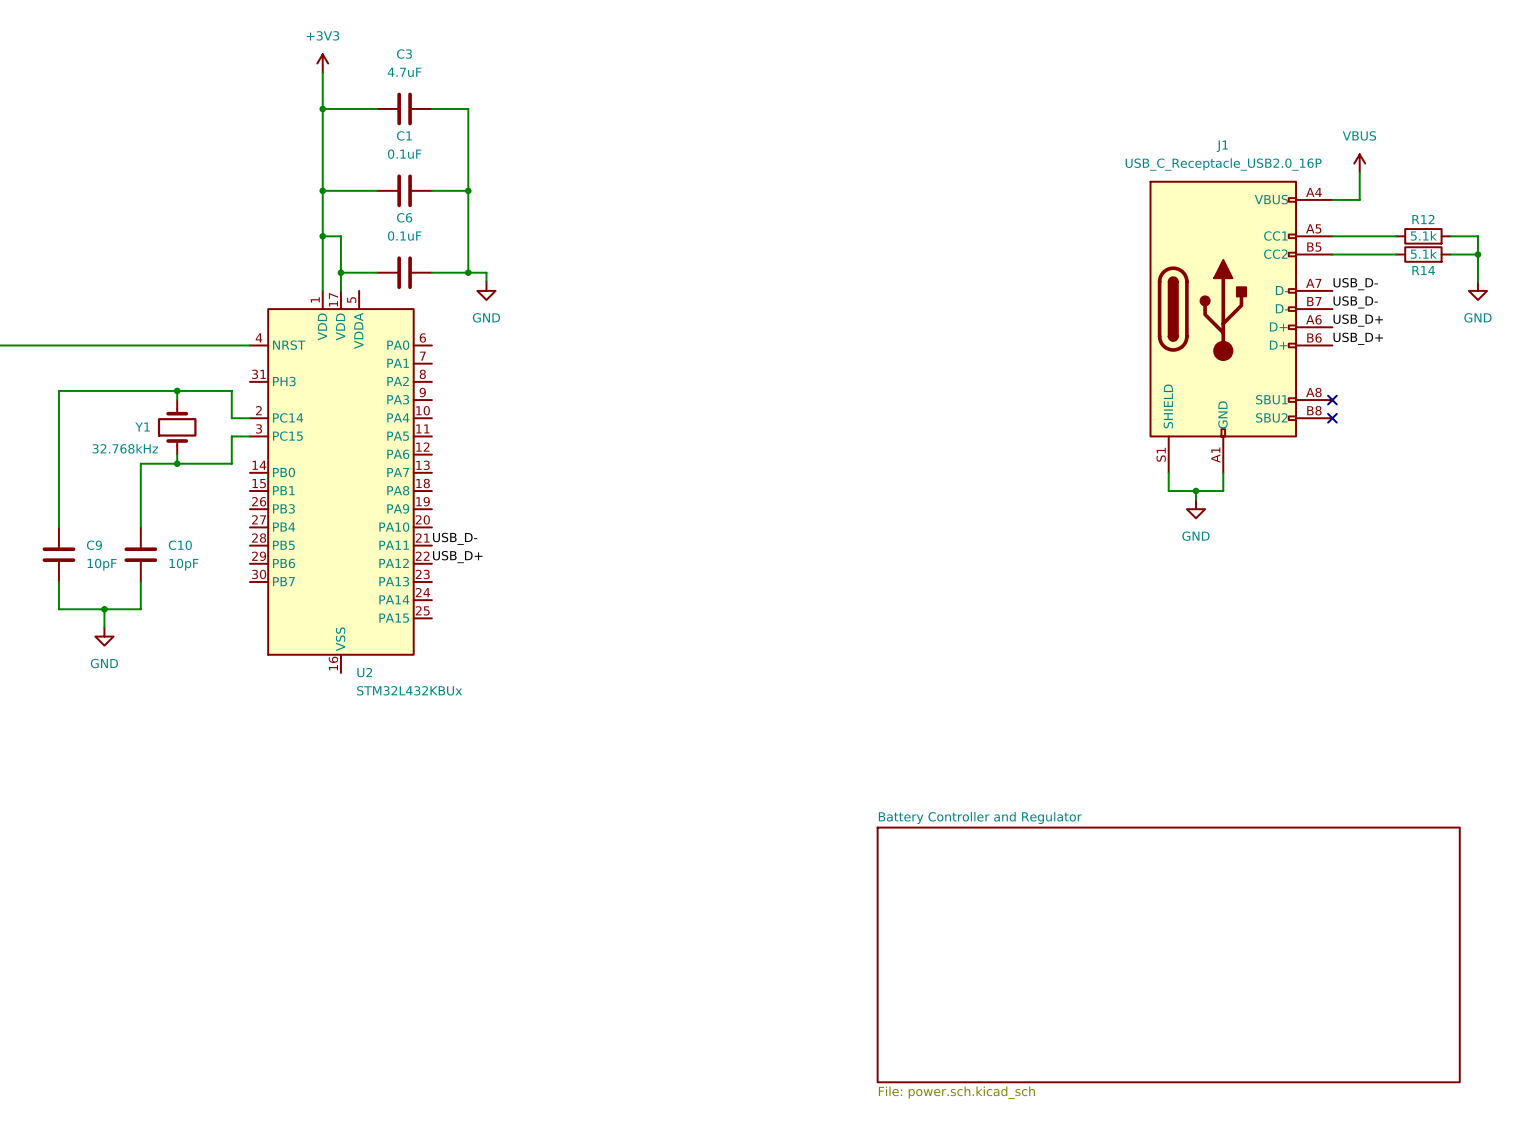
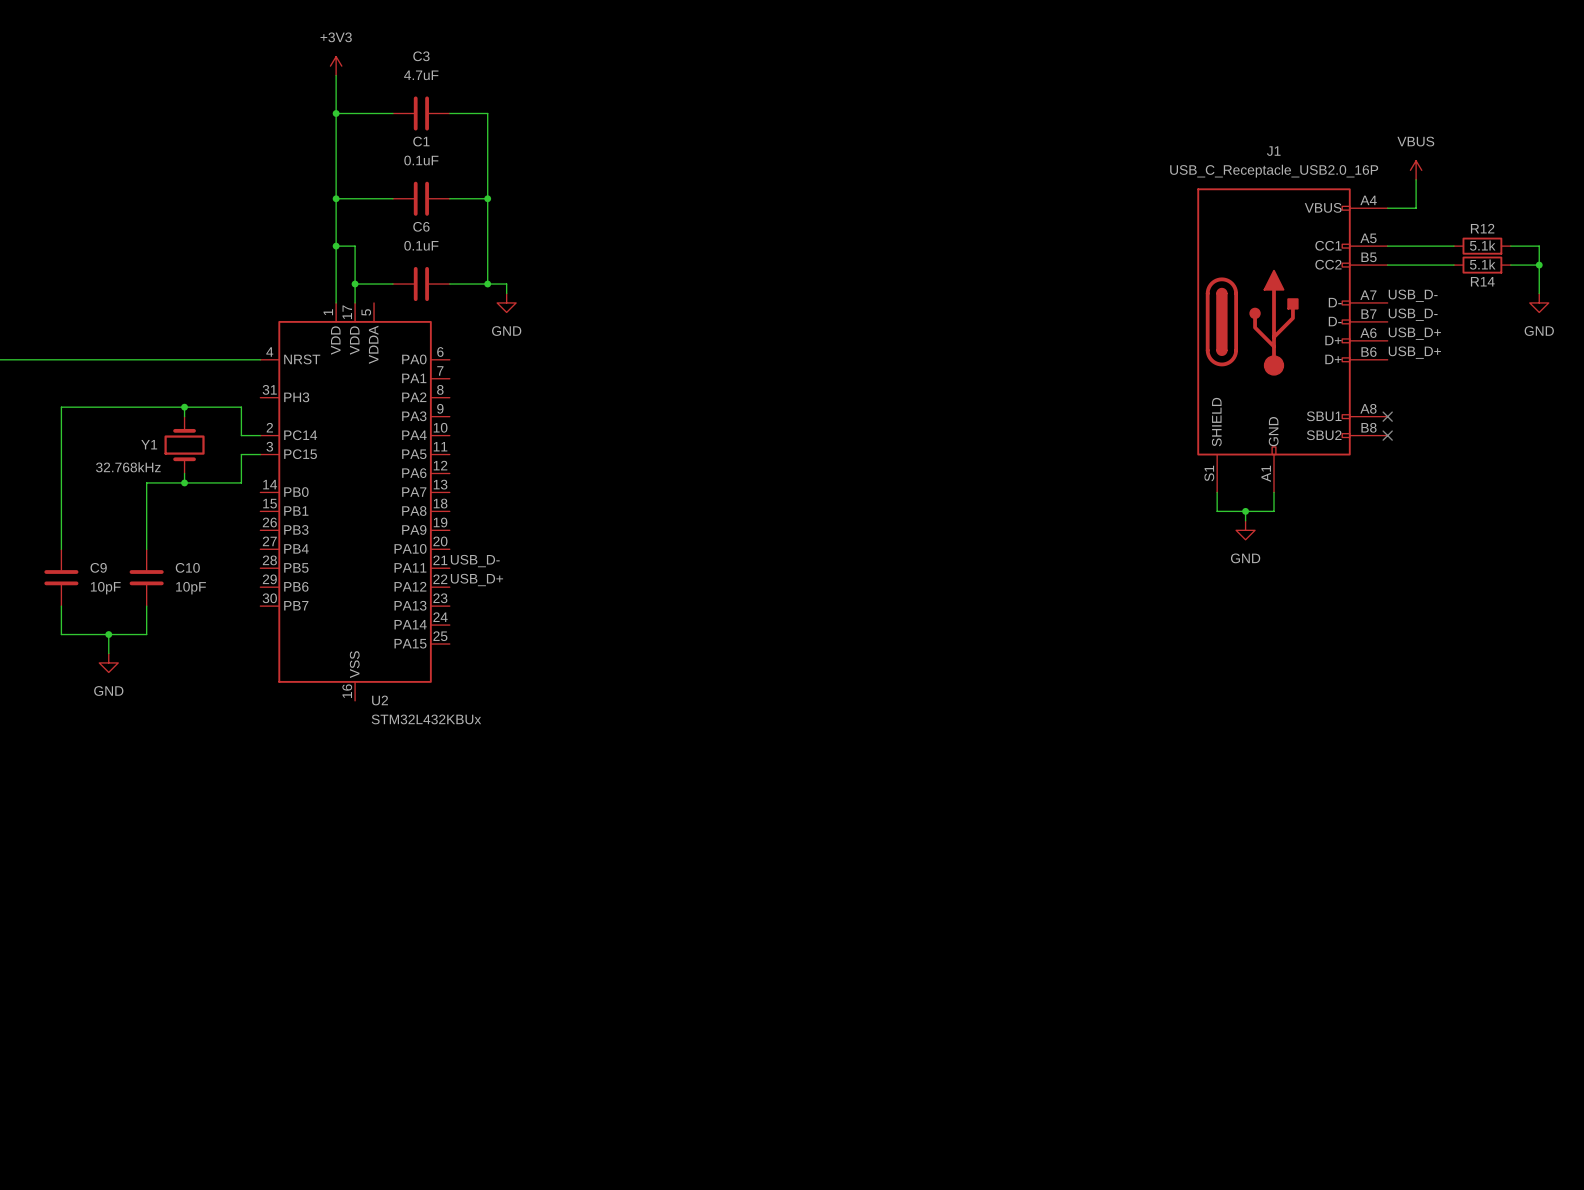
sheet Battery Controller and Regulator: File: power.sch.kicad_sch (1168, 954) -> none

